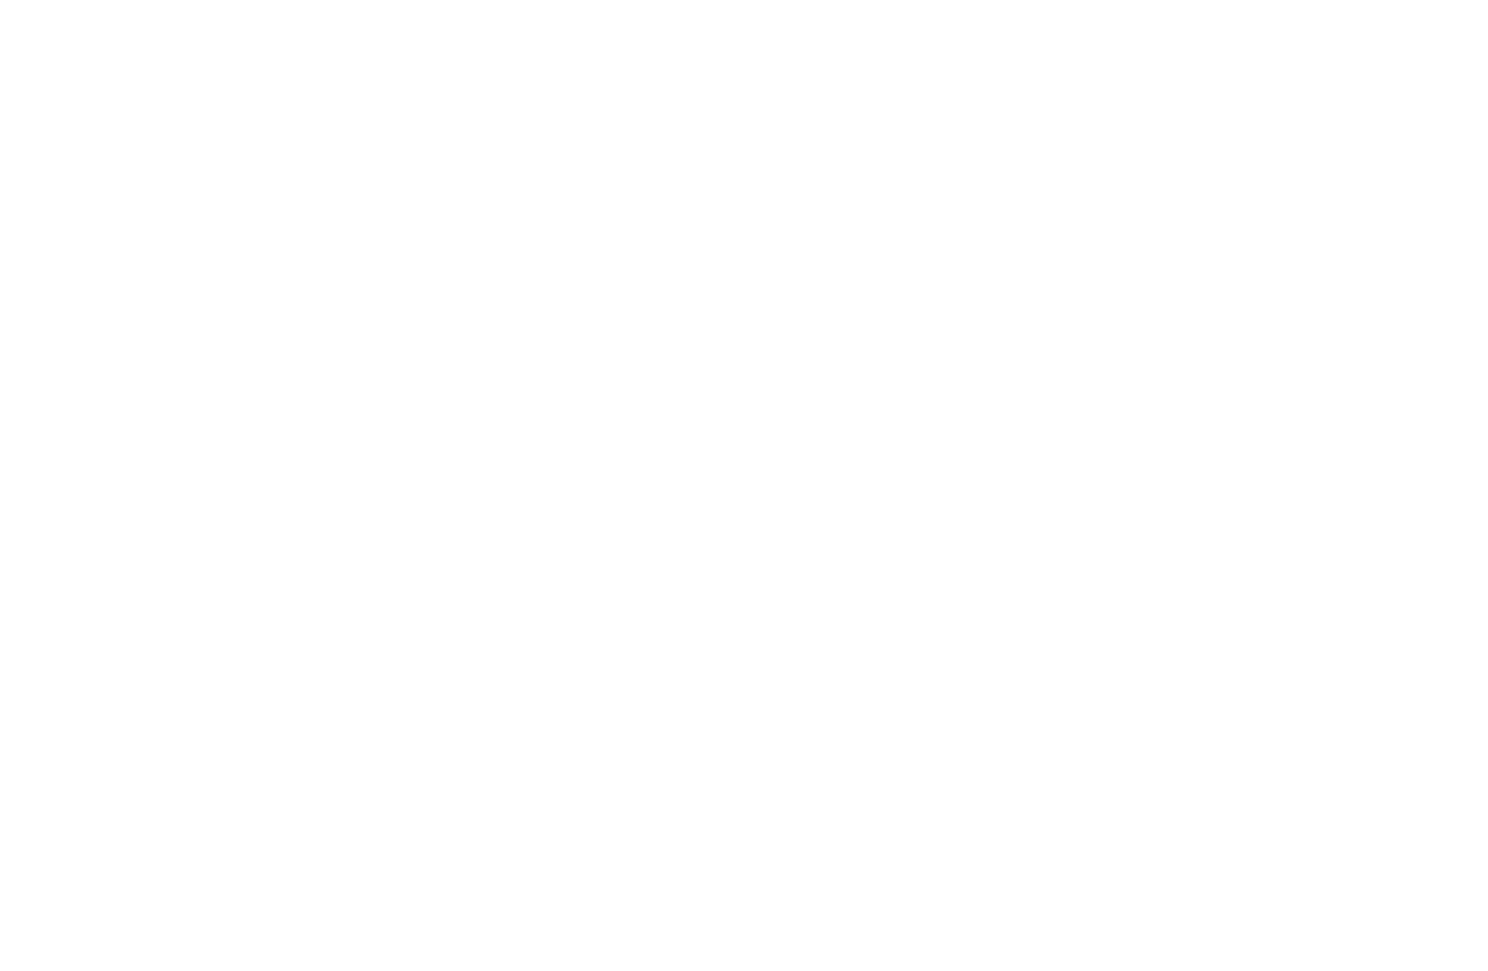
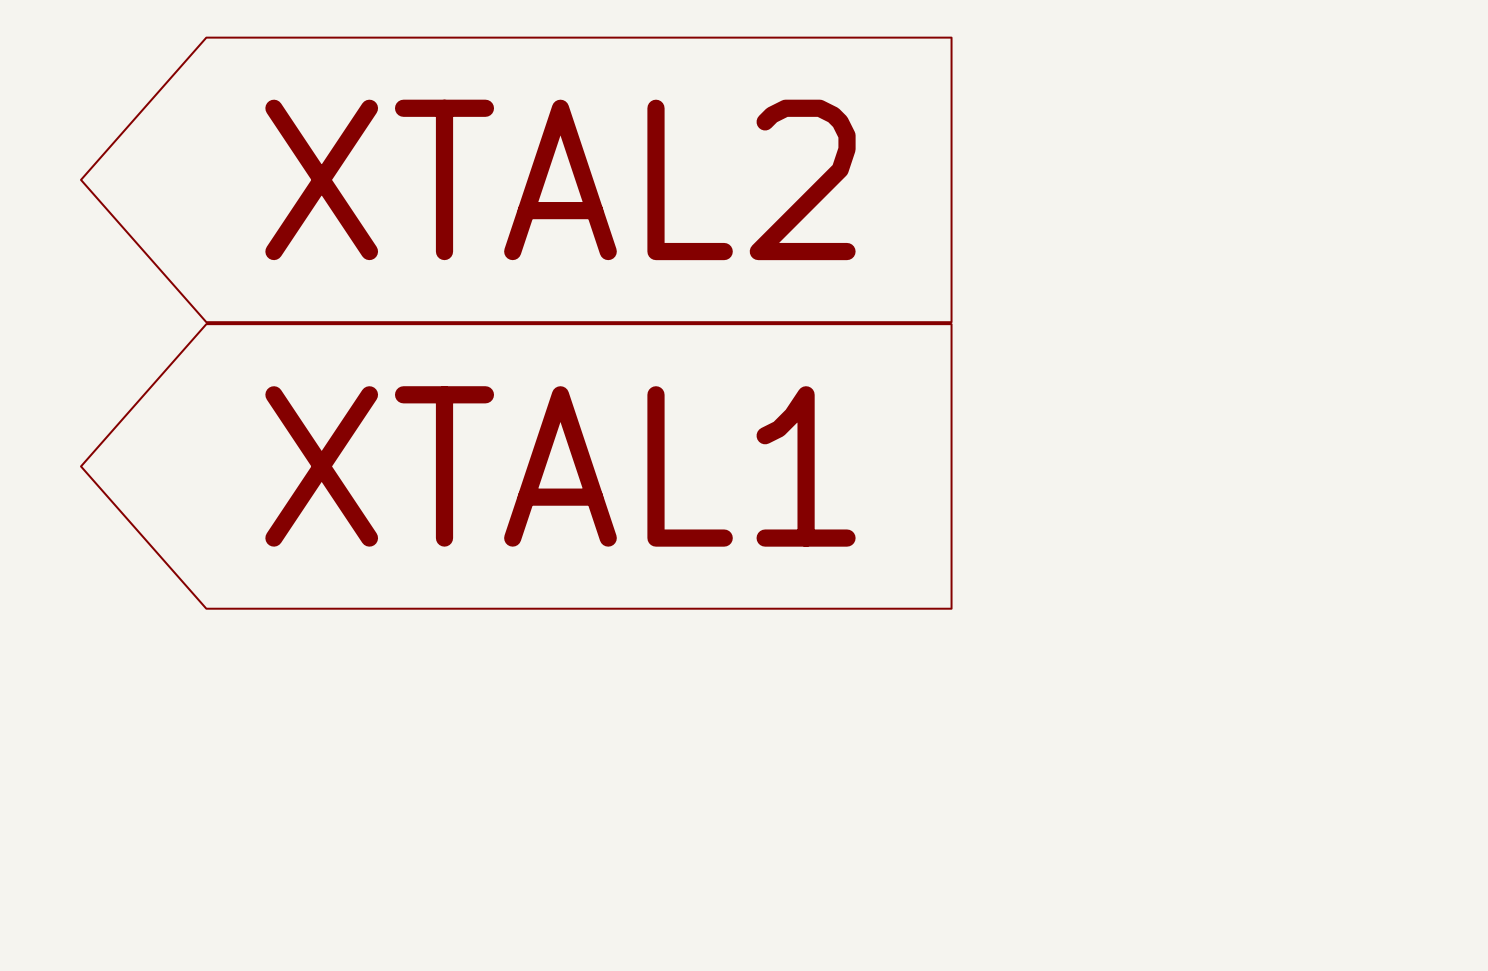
global label: none -> XTAL2 (560, 179)
global label: none -> XTAL1 (560, 466)

